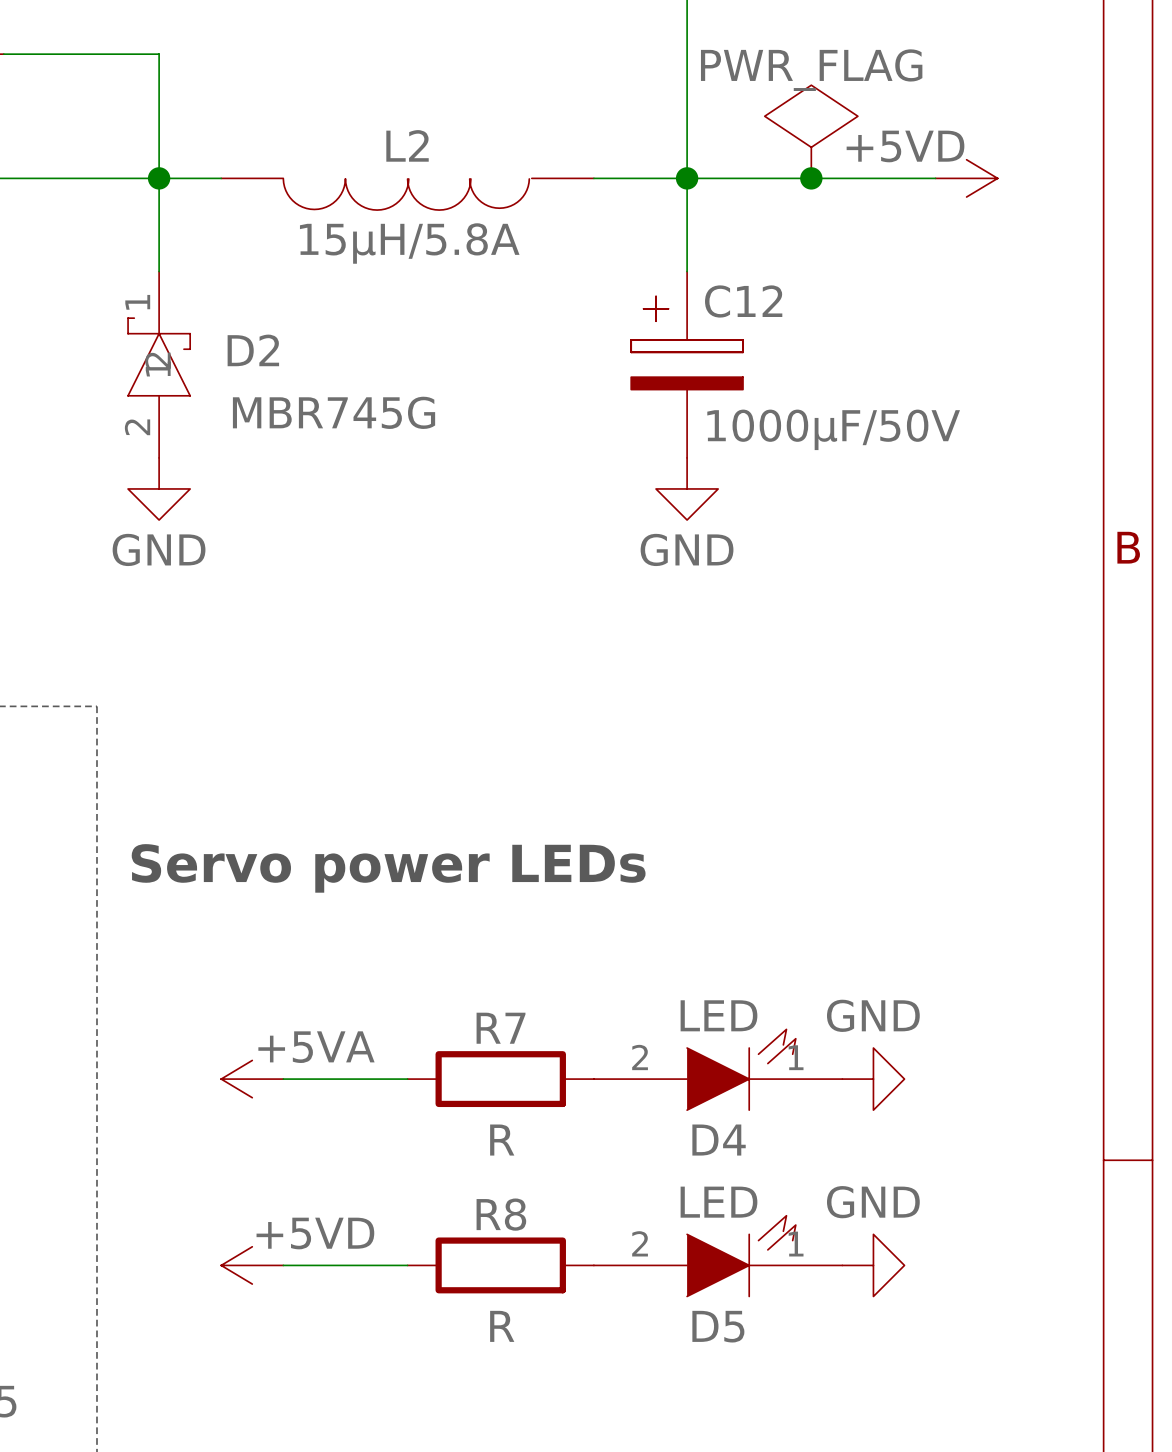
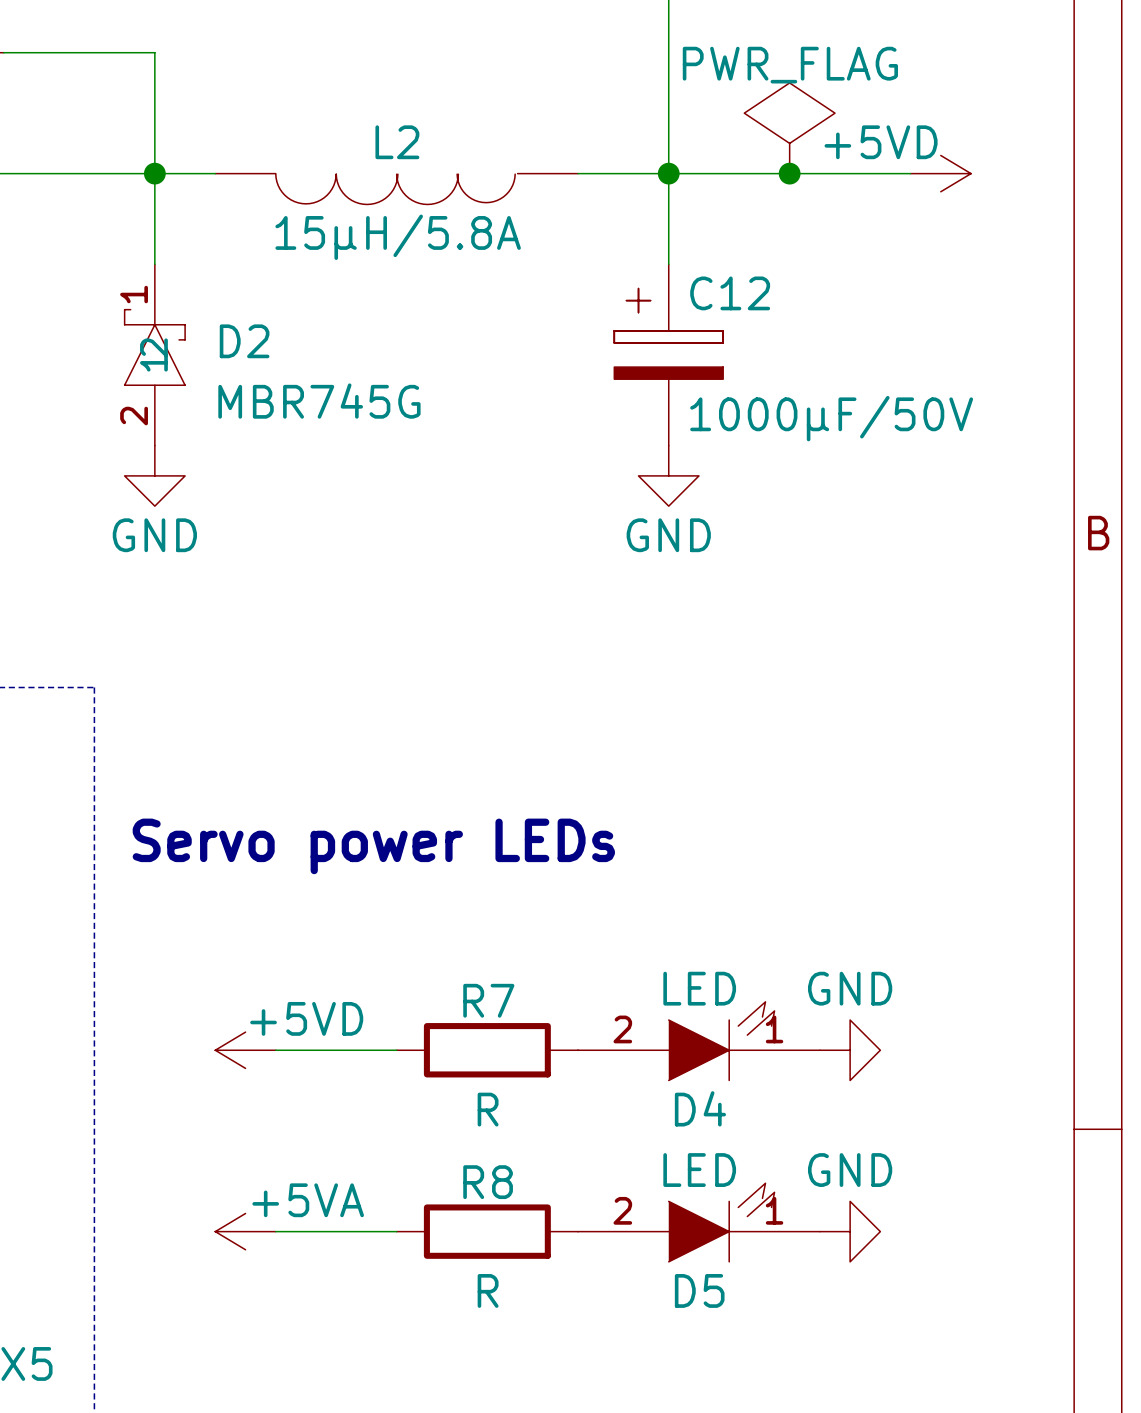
power symbol: +5VA (252, 1079) -> +5VD (245, 1050)
power symbol: +5VD (252, 1265) -> +5VA (245, 1231)

